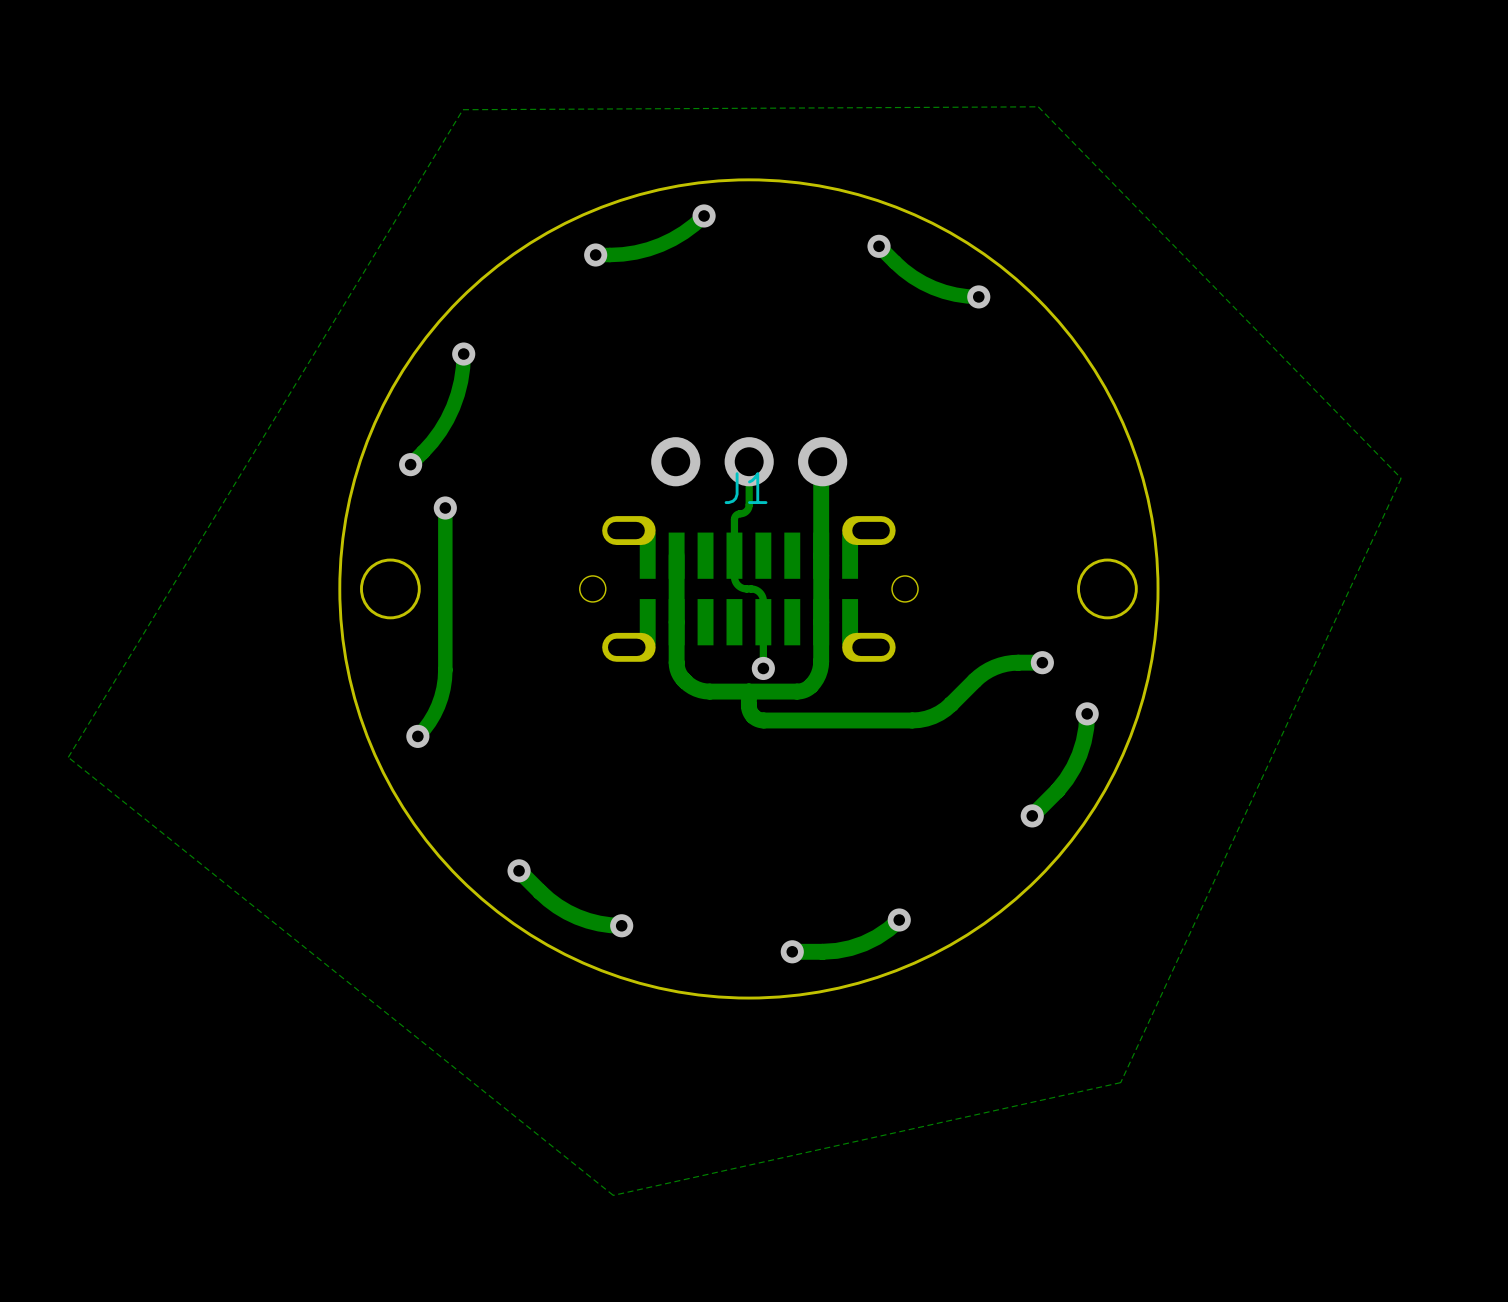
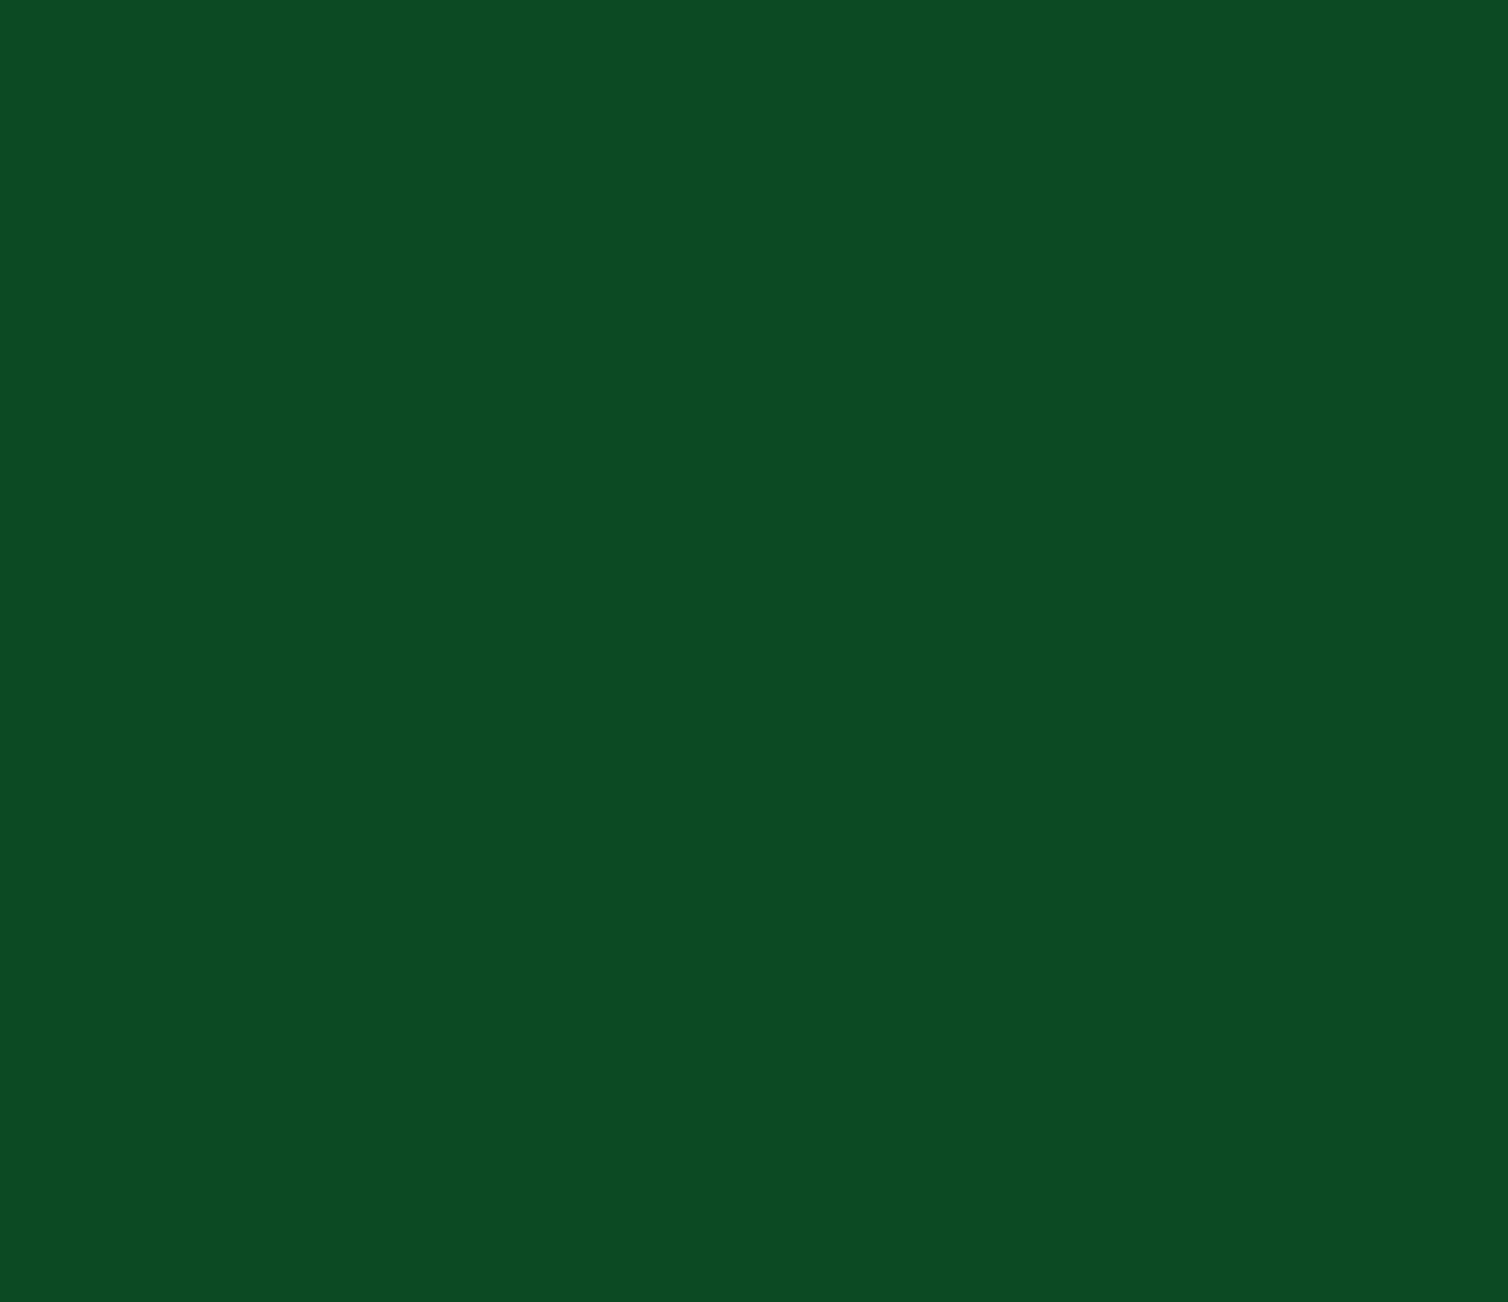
zone outline: (1038, 106) (1401, 478) (1120, 1082) (613, 1195) (68, 757) (462, 109) (1038, 106) -> none
round board edge: [338, 178, 1160, 1000] -> none
track: (704, 215) (683, 232) (660, 244) (635, 252) (595, 255) -> none
via: (704, 215) -> none
track: (879, 246) (903, 269) (922, 282) (944, 291) (978, 296) -> none
via: (879, 246) -> none
via: (595, 255) -> none
via: (978, 296) -> none
track: (463, 354) (457, 394) (447, 419) (432, 442) (410, 464) -> none
via: (463, 354) -> none
via: (675, 461) -> none
track: (749, 461) (748, 507) (745, 511) (737, 514) (734, 518) (734, 578) (739, 586) (755, 589) (762, 598) (763, 668) -> none
via: (749, 461) -> none
track: (822, 461) (820, 665) (816, 678) (806, 689) (797, 691) (705, 691) (692, 686) (683, 679) (678, 672) (676, 662) (676, 548) -> none
via: (822, 461) -> none
via: (410, 464) -> none
track: (445, 507) (444, 679) (441, 697) (434, 714) (417, 736) -> none
via: (445, 507) -> none
round board edge: [360, 558, 421, 620] -> none
round board edge: [1077, 558, 1138, 620] -> none
J1: (748, 588) -> none
track: (1042, 662) (1012, 662) (994, 667) (979, 676) (945, 709) (933, 716) (919, 720) (761, 720) (754, 717) (750, 711) (748, 691) -> none
via: (1042, 662) -> none
via: (763, 668) -> none
via: (1087, 713) -> none
track: (1083, 714) (1087, 713) (1086, 727) (1083, 741) (1073, 767) (1057, 790) (1032, 815) -> none
via: (417, 736) -> none
via: (1032, 815) -> none
track: (519, 870) (548, 899) (567, 912) (599, 923) (621, 925) -> none
via: (519, 870) -> none
track: (899, 919) (876, 937) (850, 948) (822, 951) (792, 951) -> none
via: (899, 919) -> none
via: (621, 925) -> none
via: (792, 951) -> none

